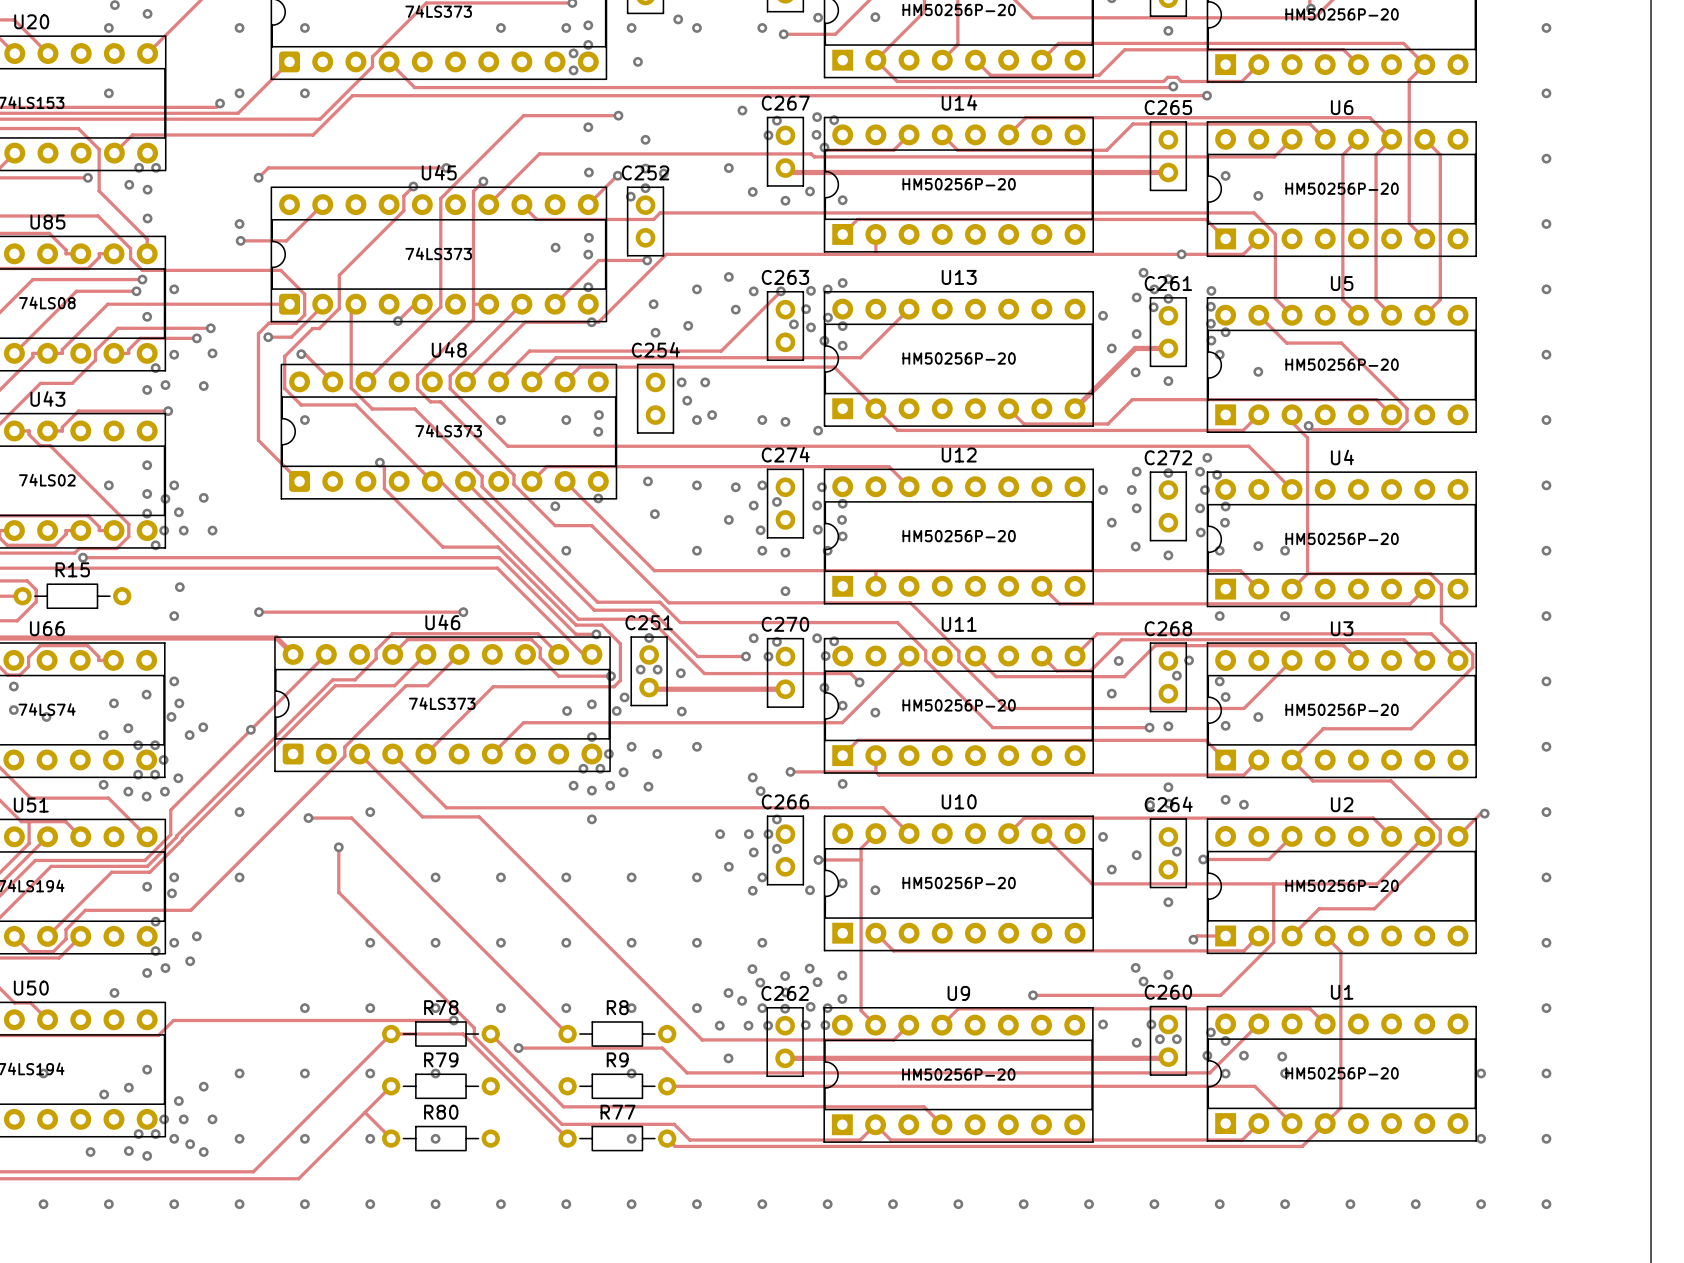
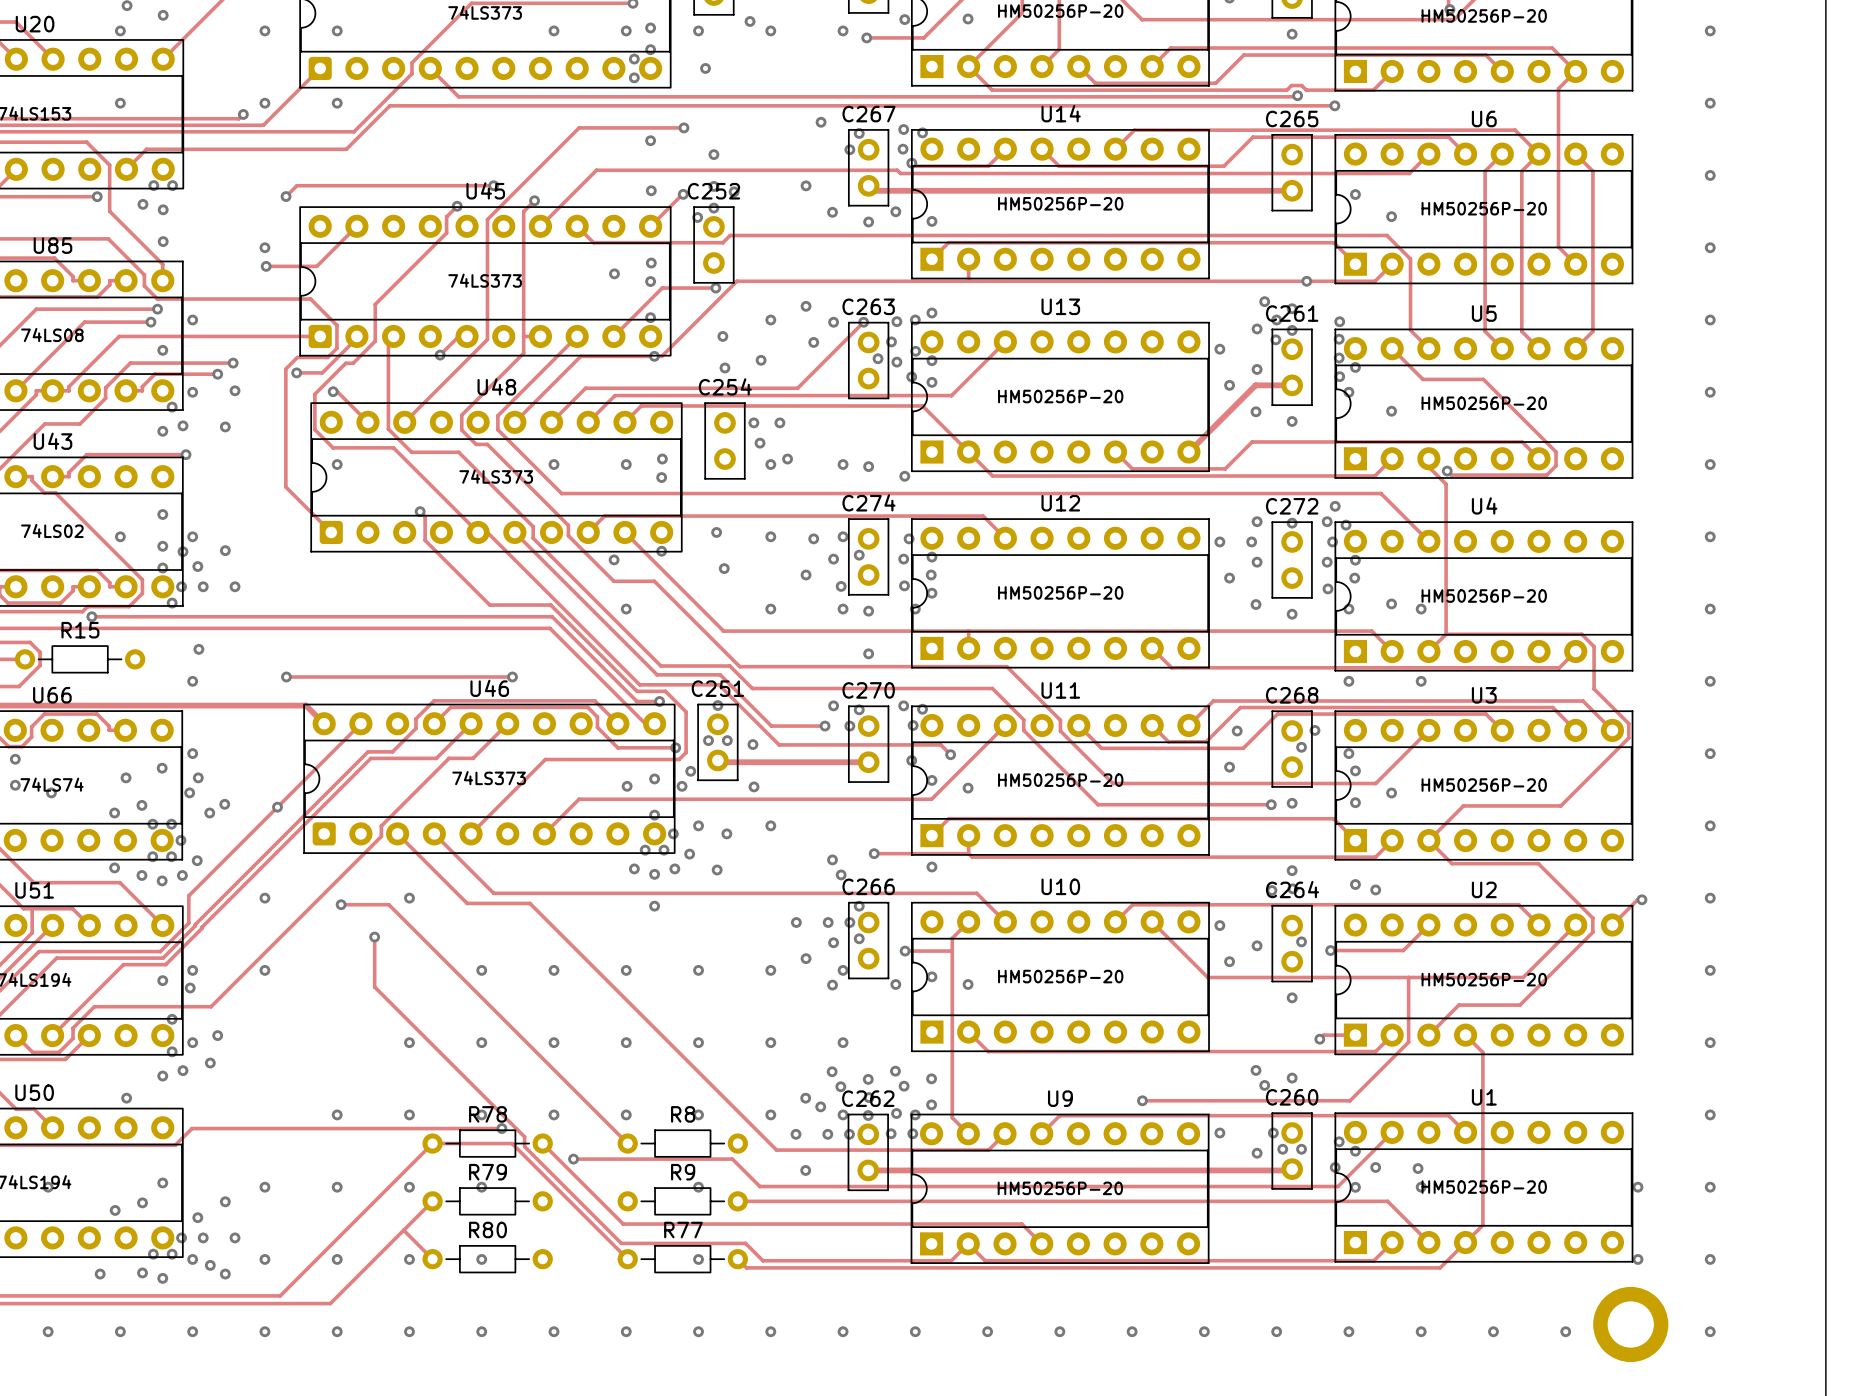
part: none -> (1630, 1324)
via: (1481, 1204) -> none

